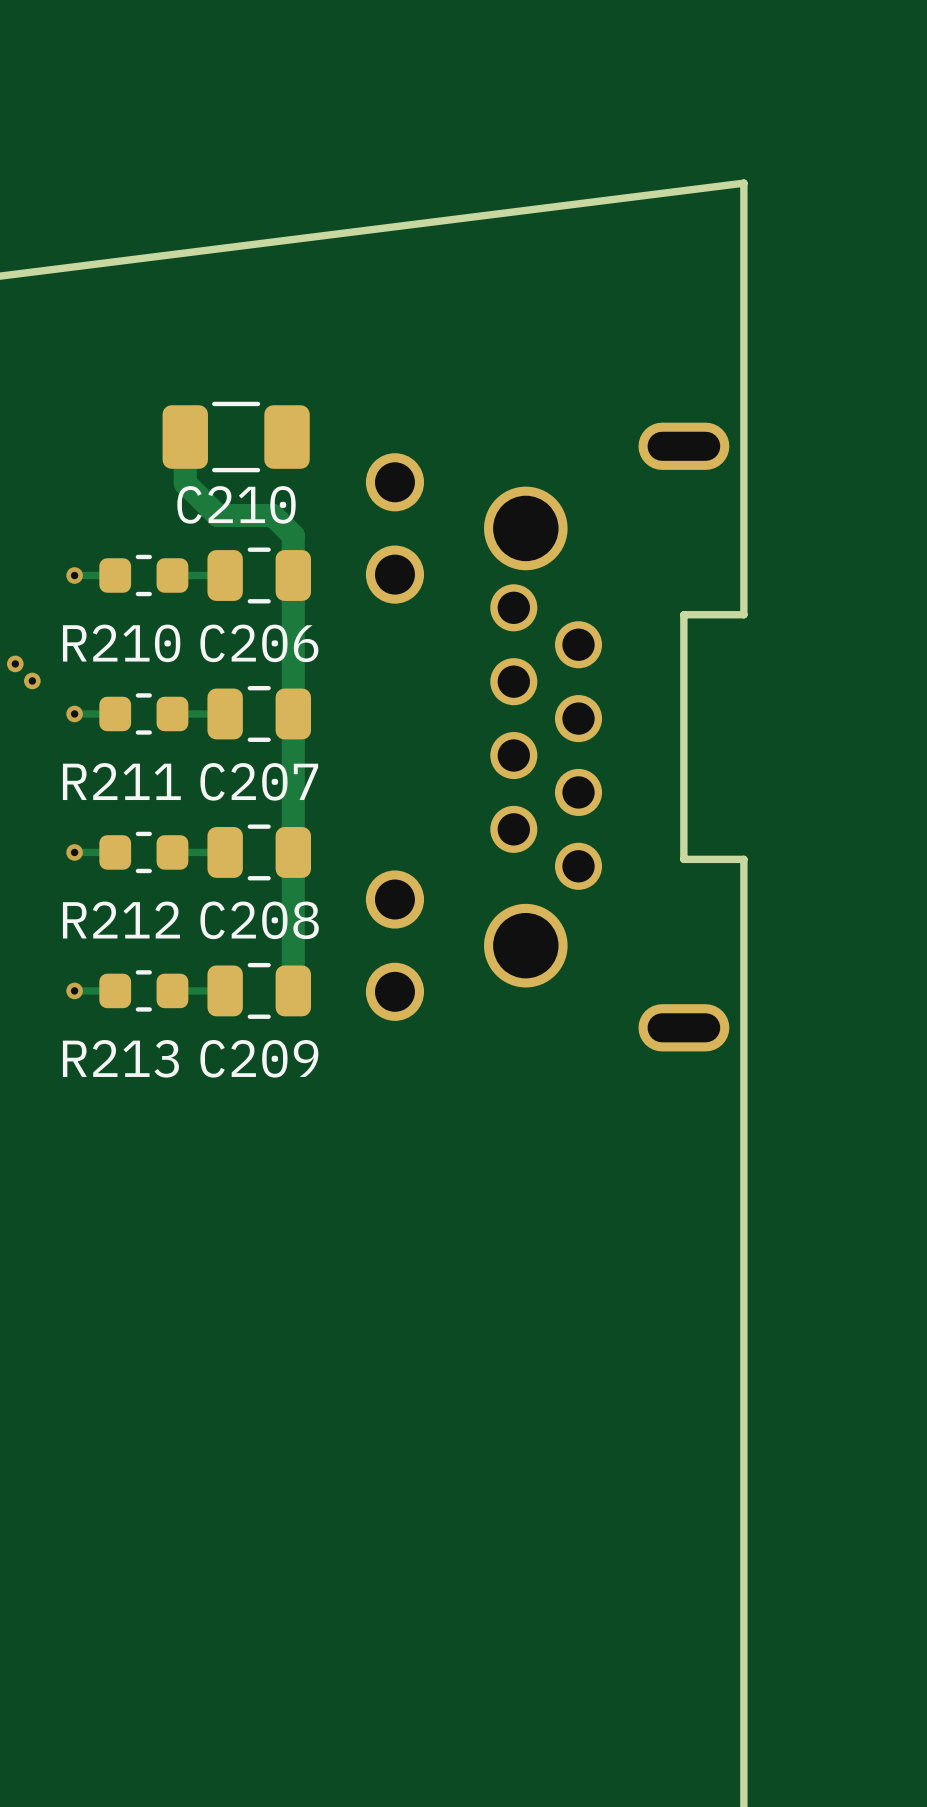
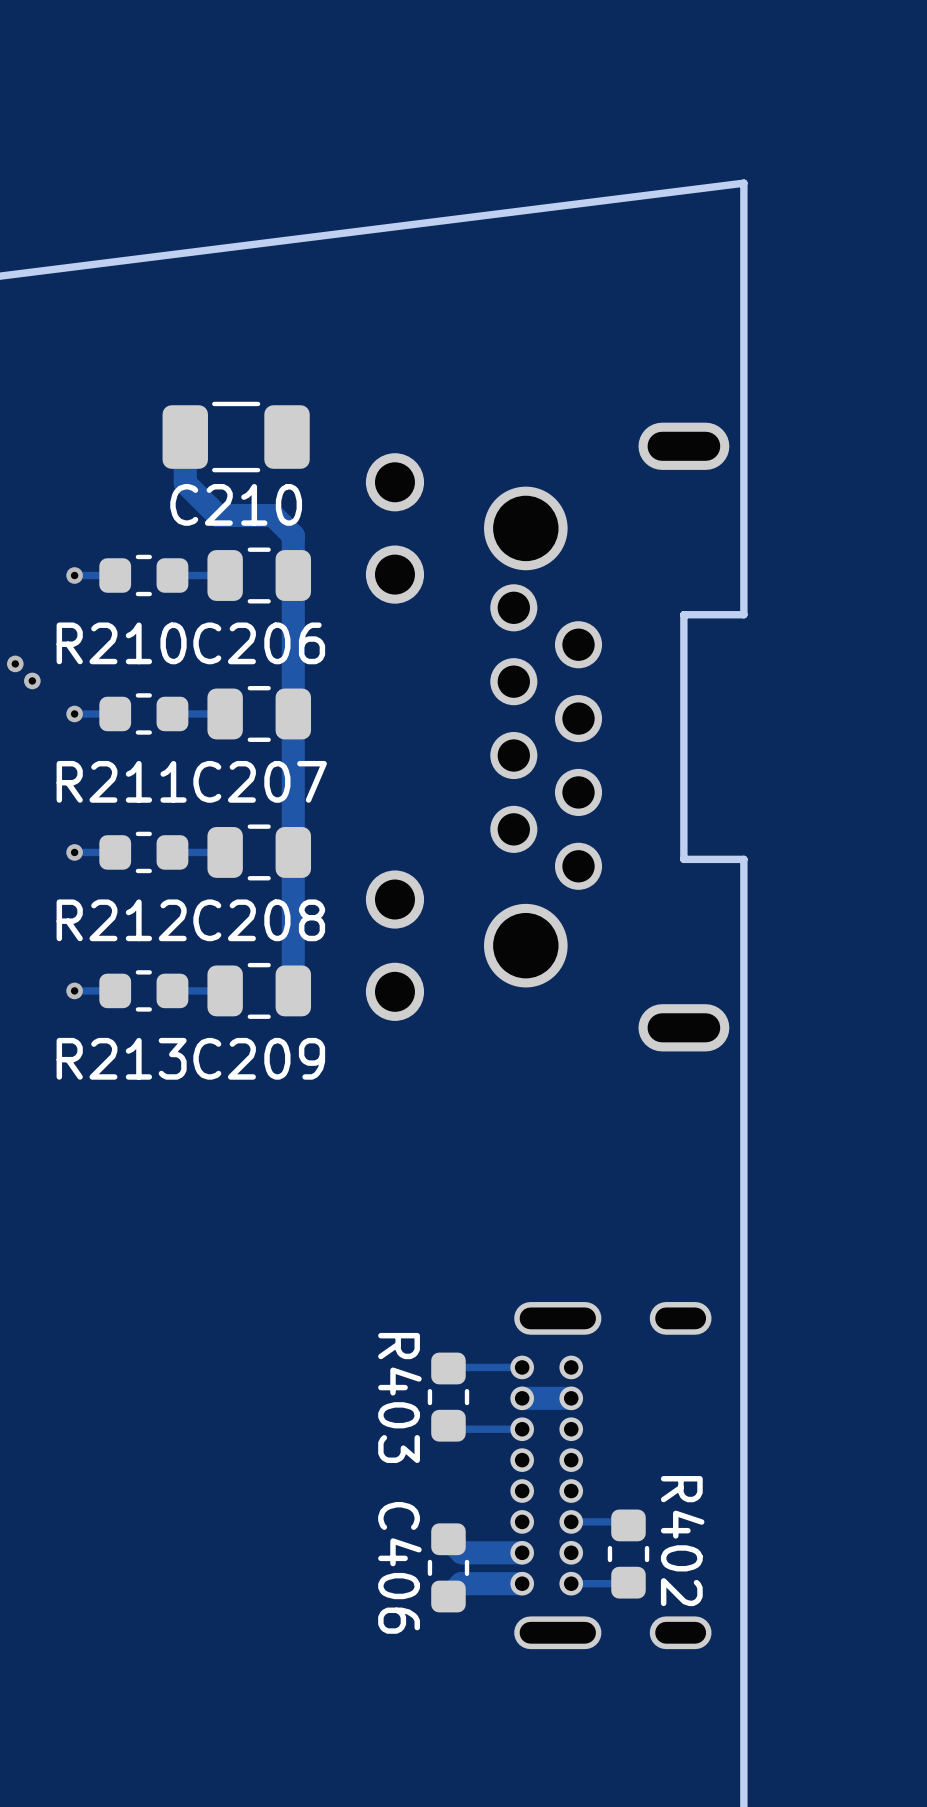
track: none -> (522, 1367) (448, 1368)
R403: none -> (448, 1397)
track: none -> (571, 1398) (522, 1398)
track: none -> (448, 1425) (451, 1429) (522, 1429)
part: none -> (610, 1475)
track: none -> (571, 1521) (624, 1521) (628, 1525)
track: none -> (448, 1539) (462, 1552) (522, 1552)
R402: none -> (628, 1554)
C406: none -> (448, 1567)
track: none -> (628, 1582) (571, 1583)
track: none -> (522, 1583) (461, 1583) (448, 1596)

